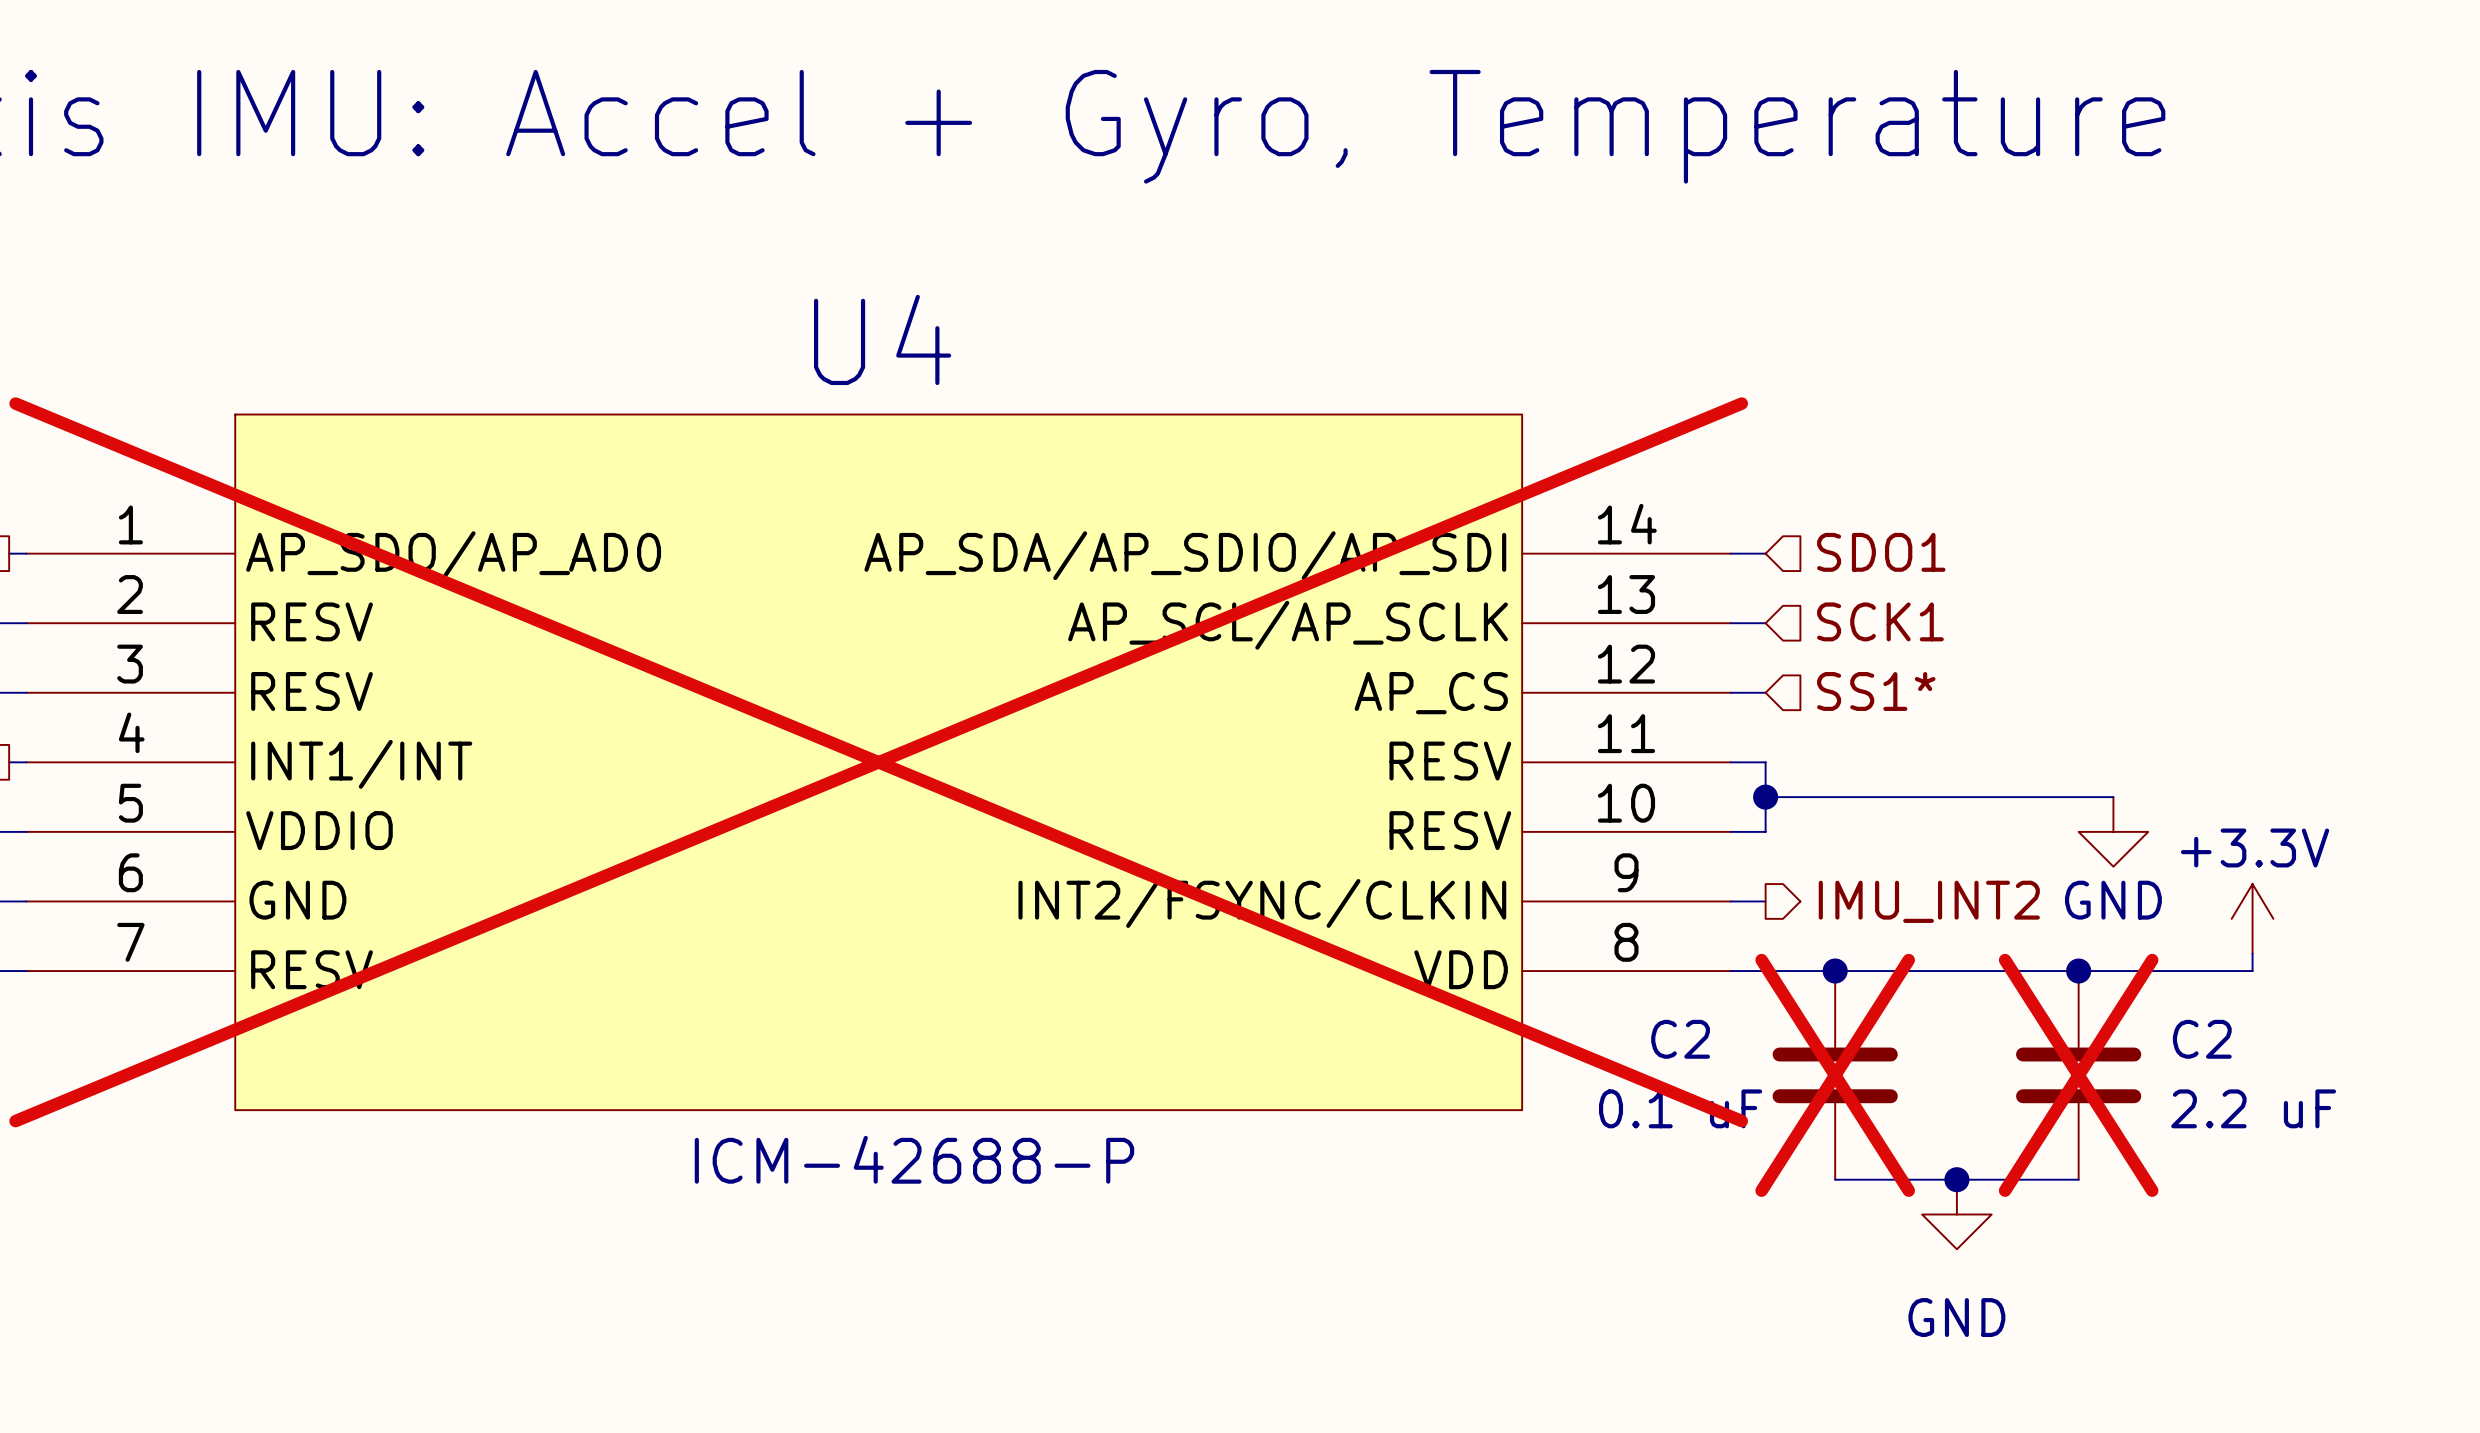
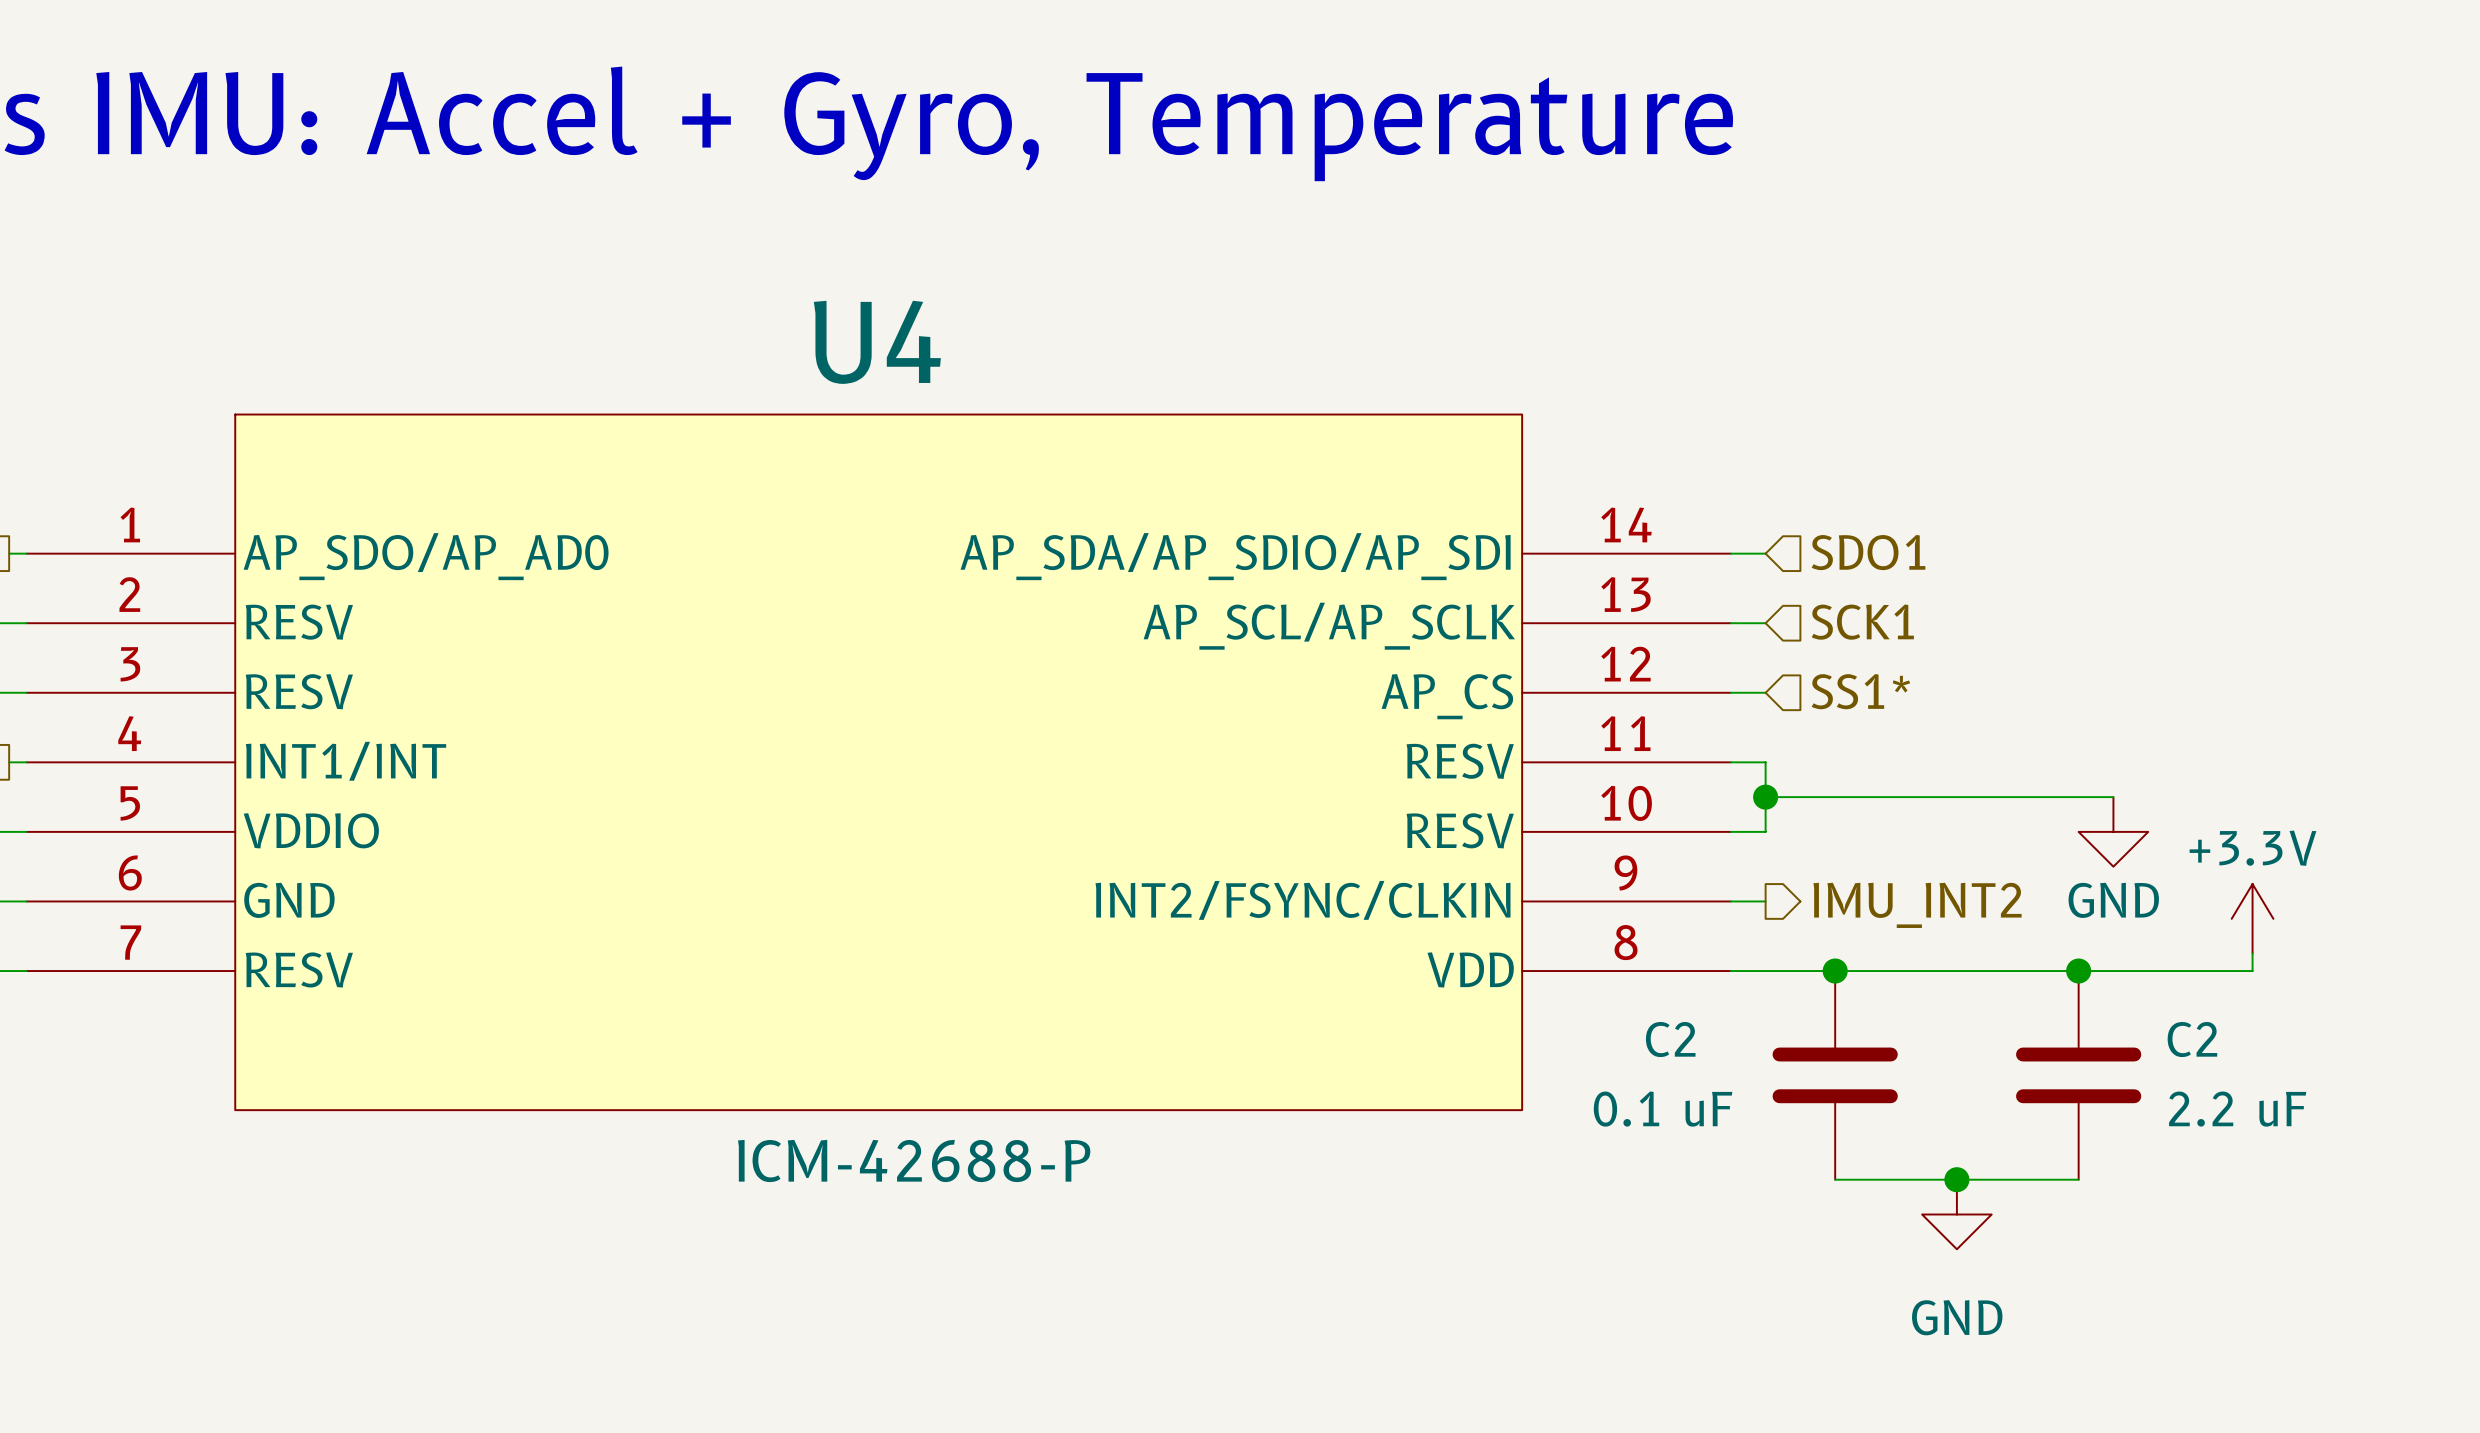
U4 do-not-place cross: (878, 762) -> none
C2 do-not-place cross: (1835, 1075) -> none
C2 do-not-place cross: (2078, 1075) -> none

